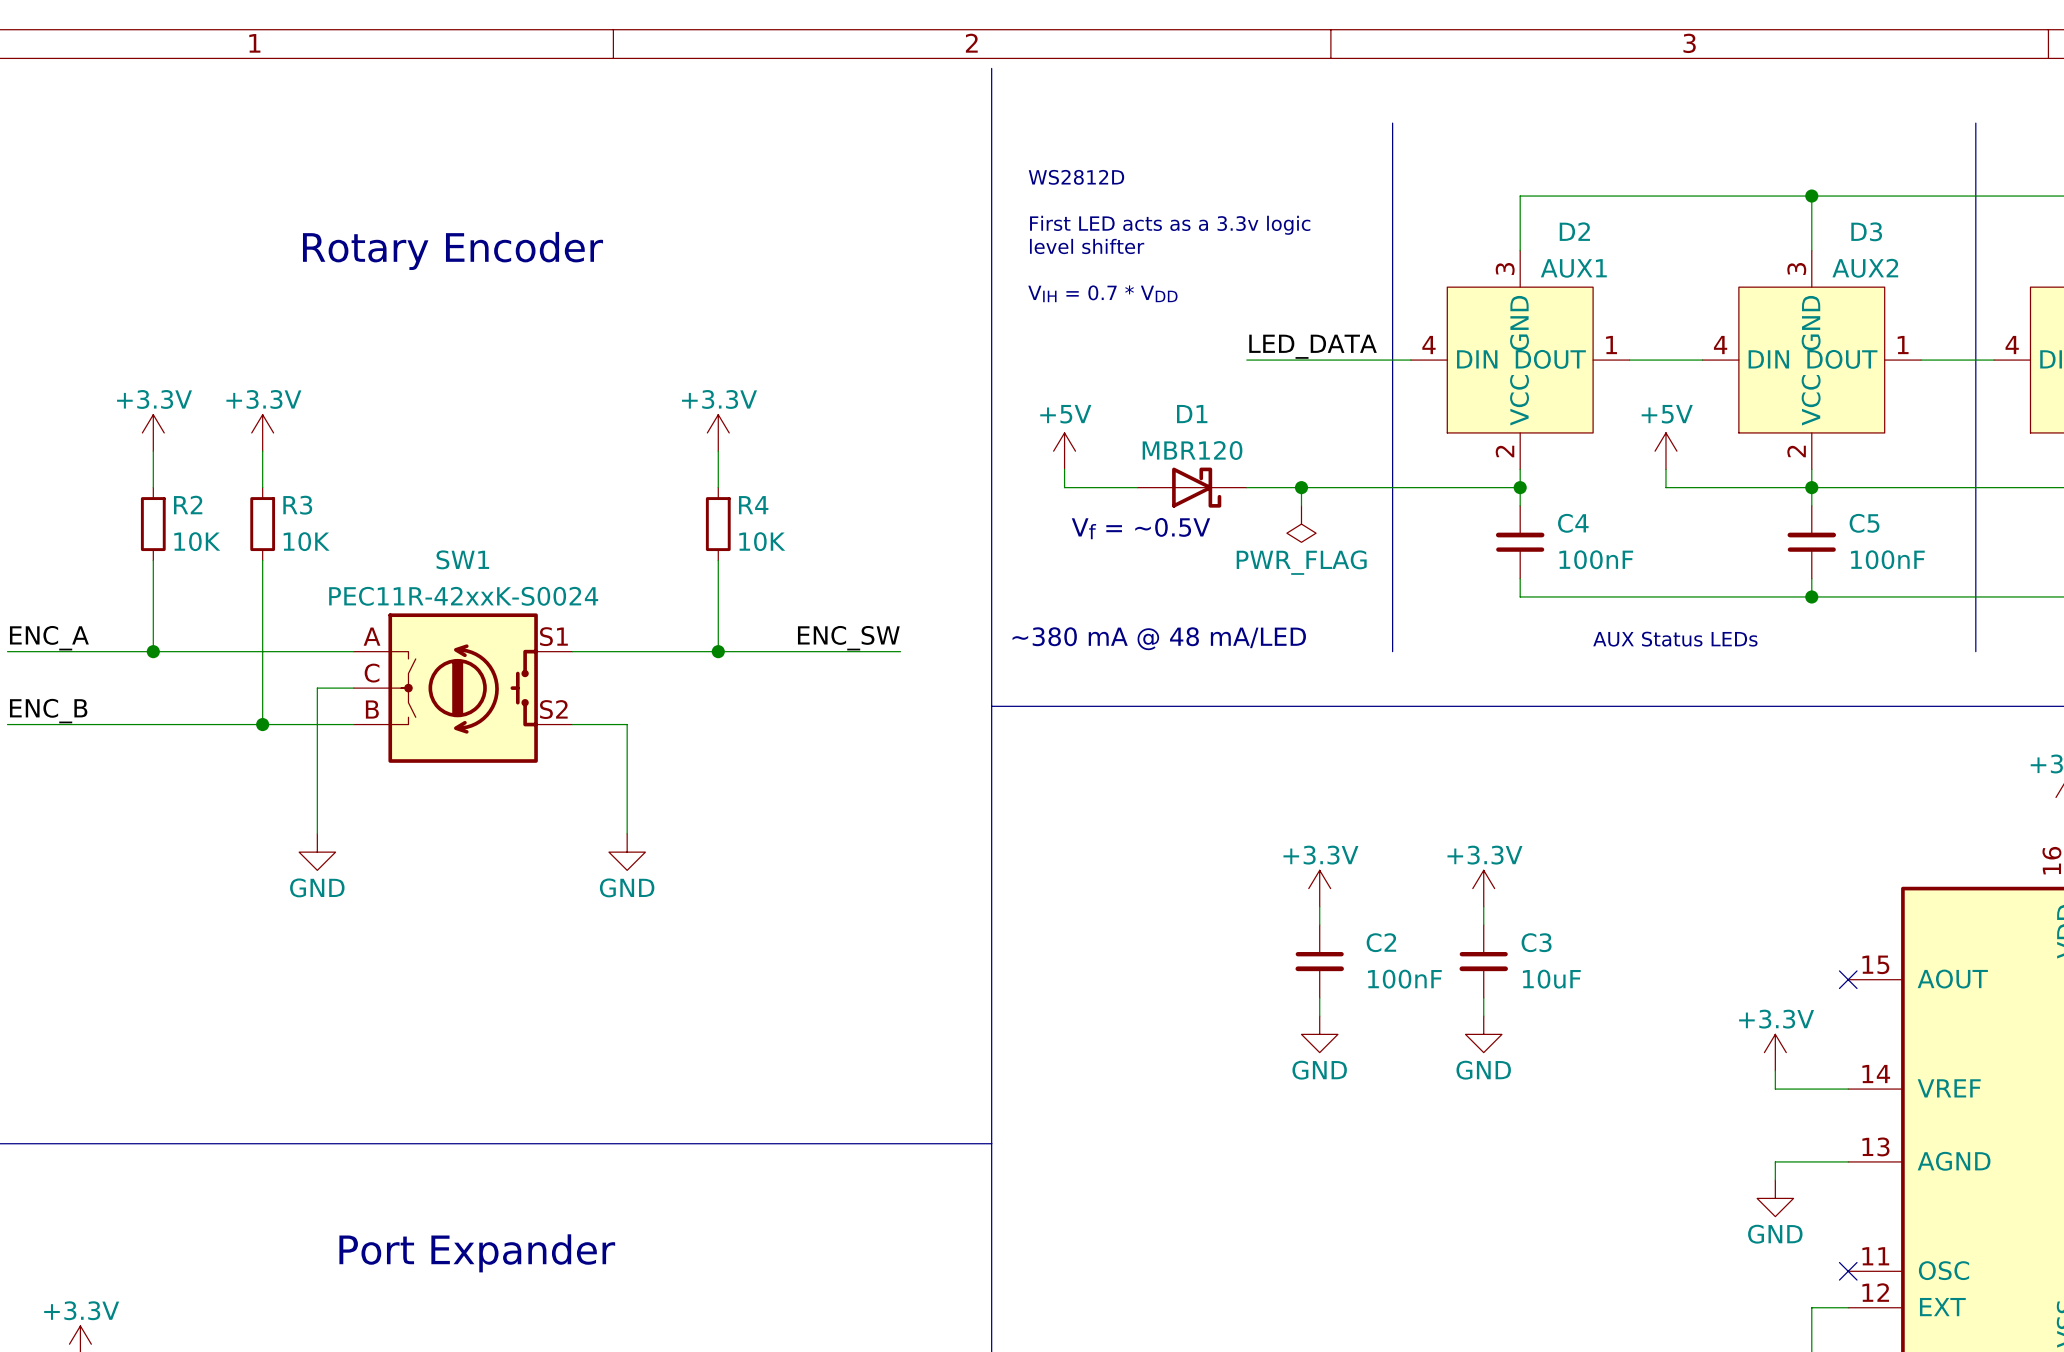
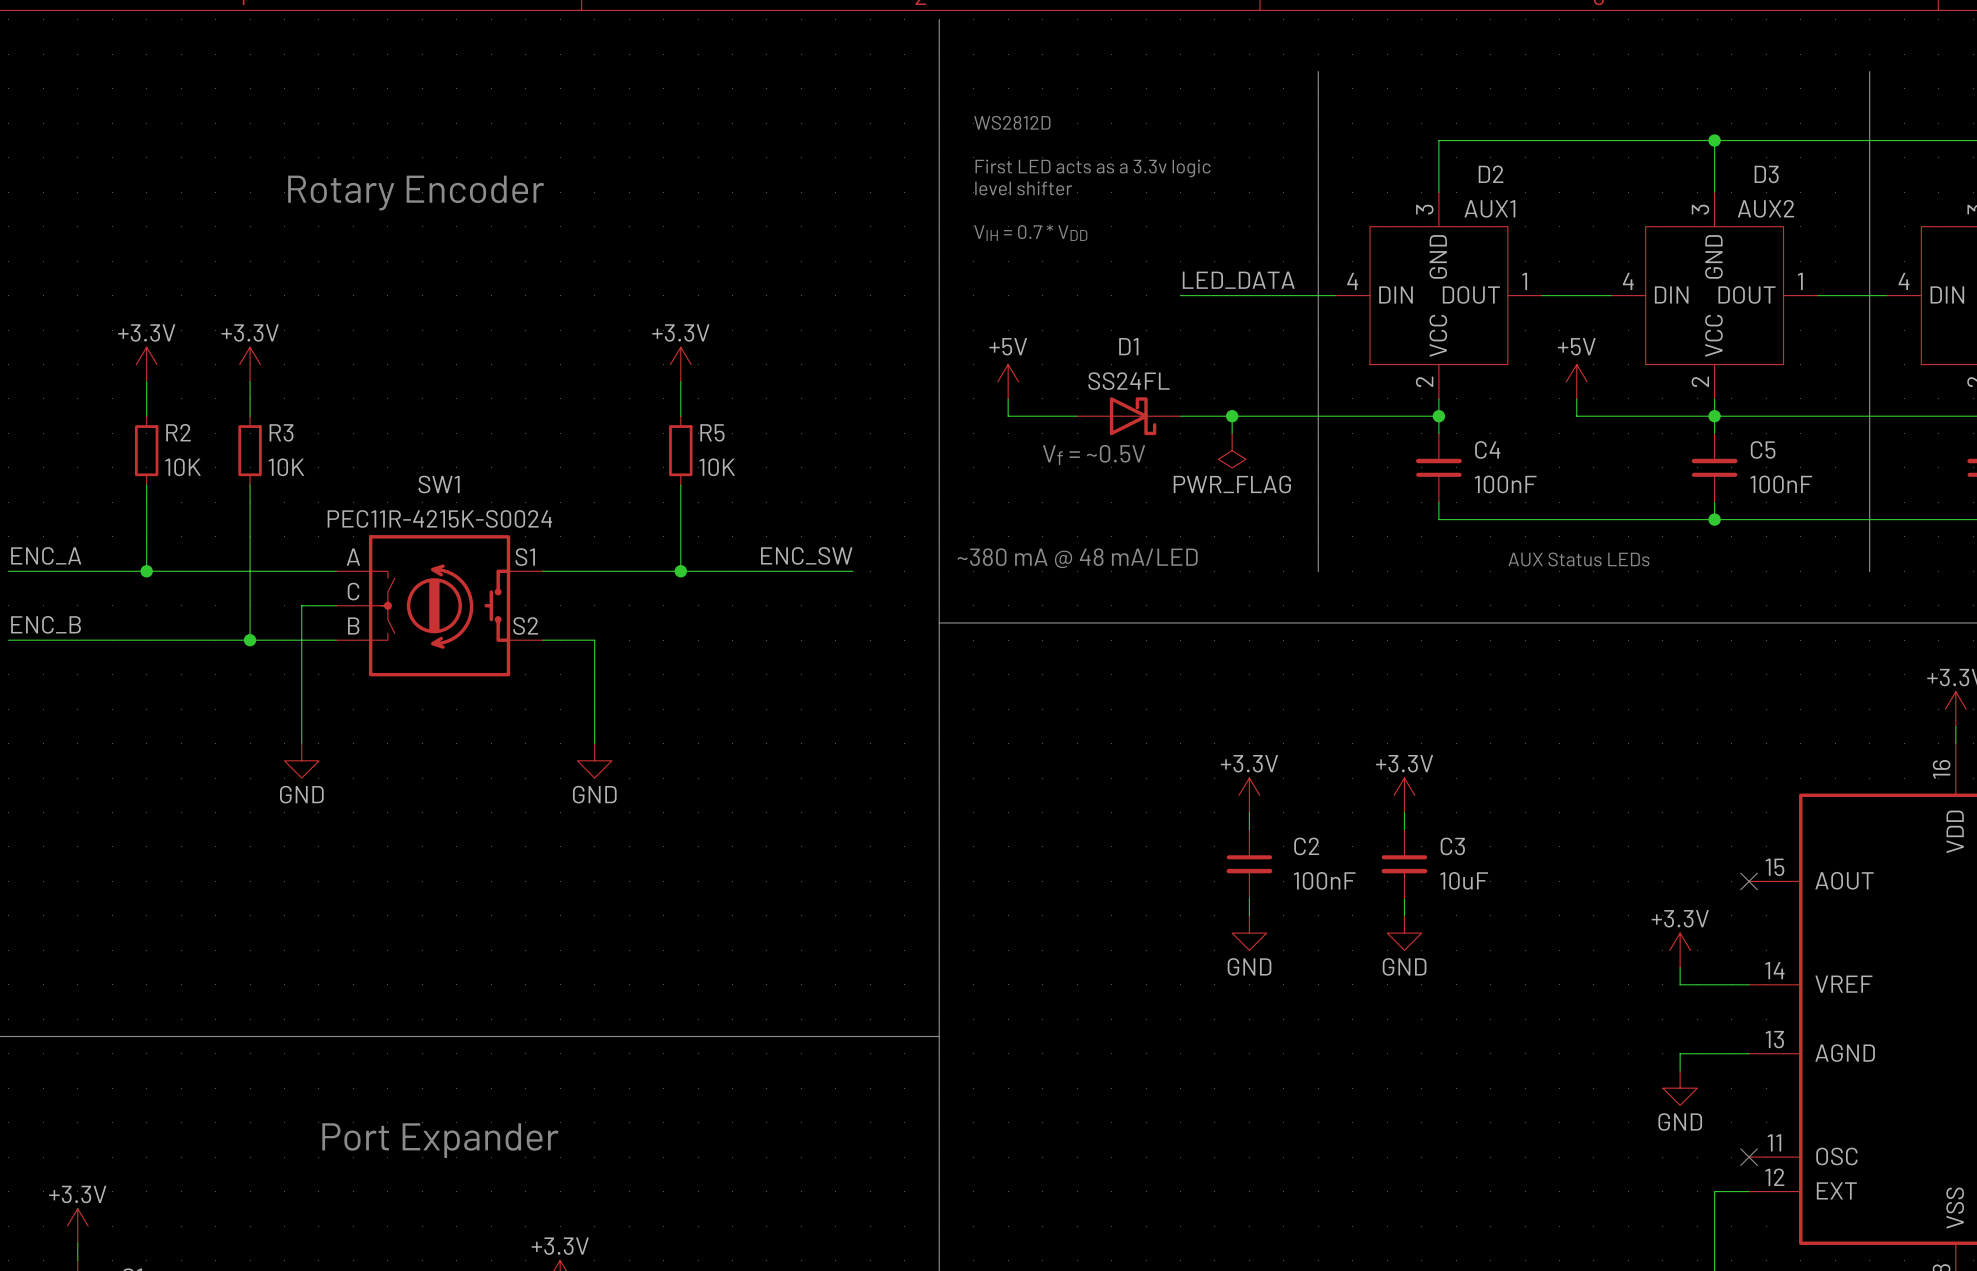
D1 value: MBR120 (1192, 450) -> SS24FL (1128, 381)
R4 name: R4 (753, 505) -> R5 (712, 432)
SW1 value: PEC11R-42xxK-S0024 (463, 596) -> PEC11R-4215K-S0024 (439, 518)

